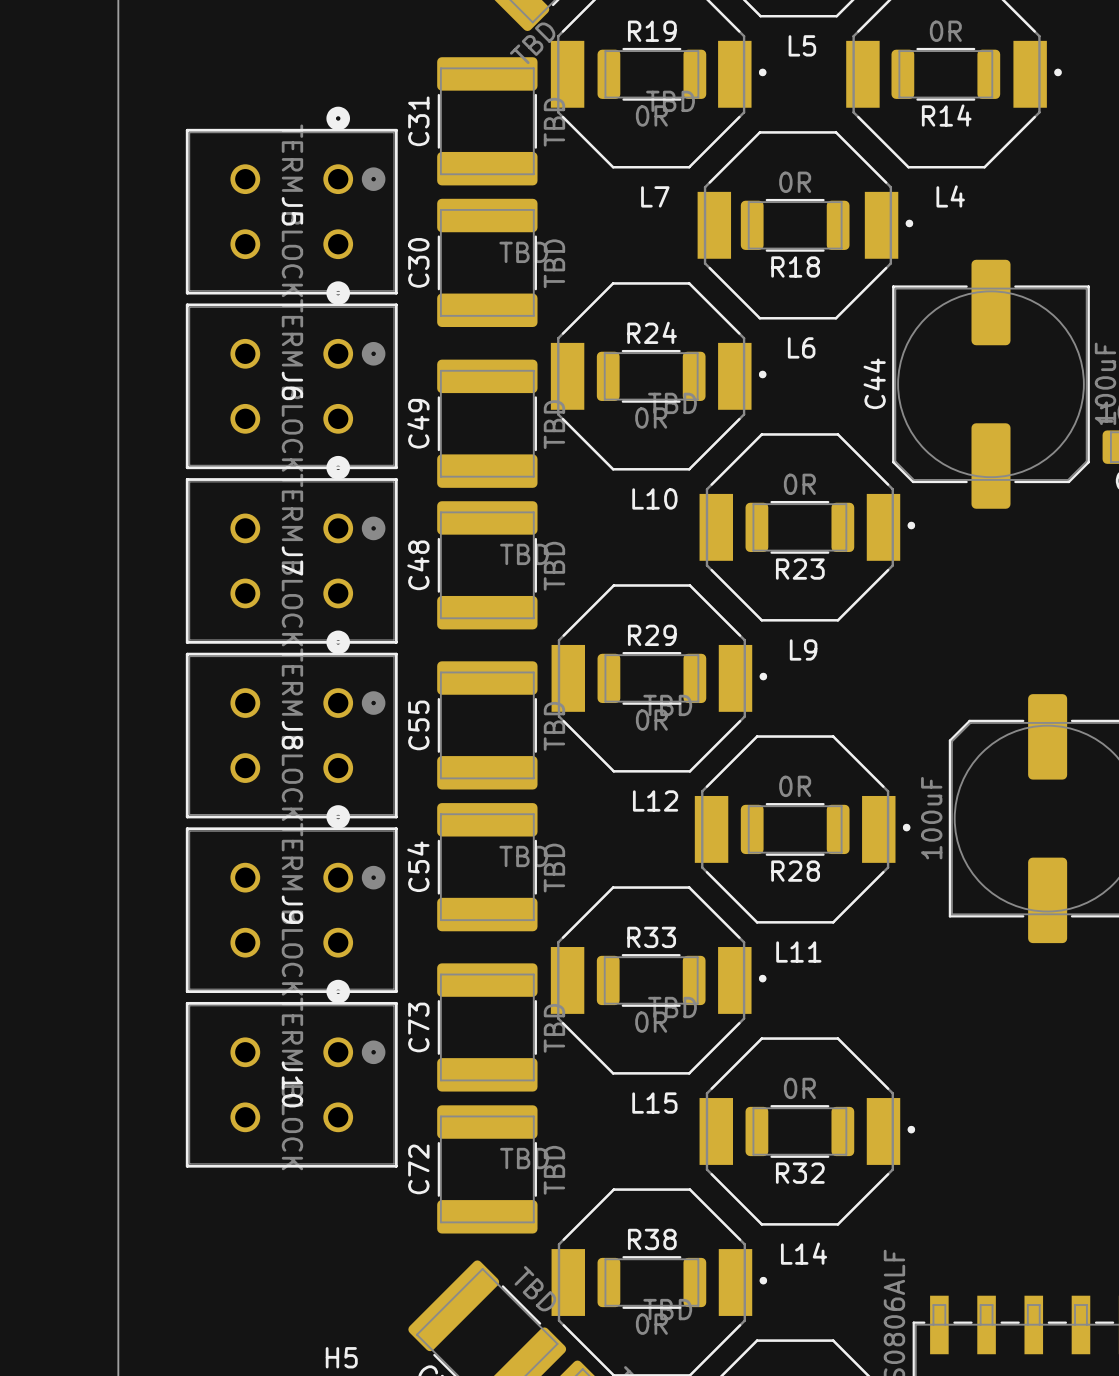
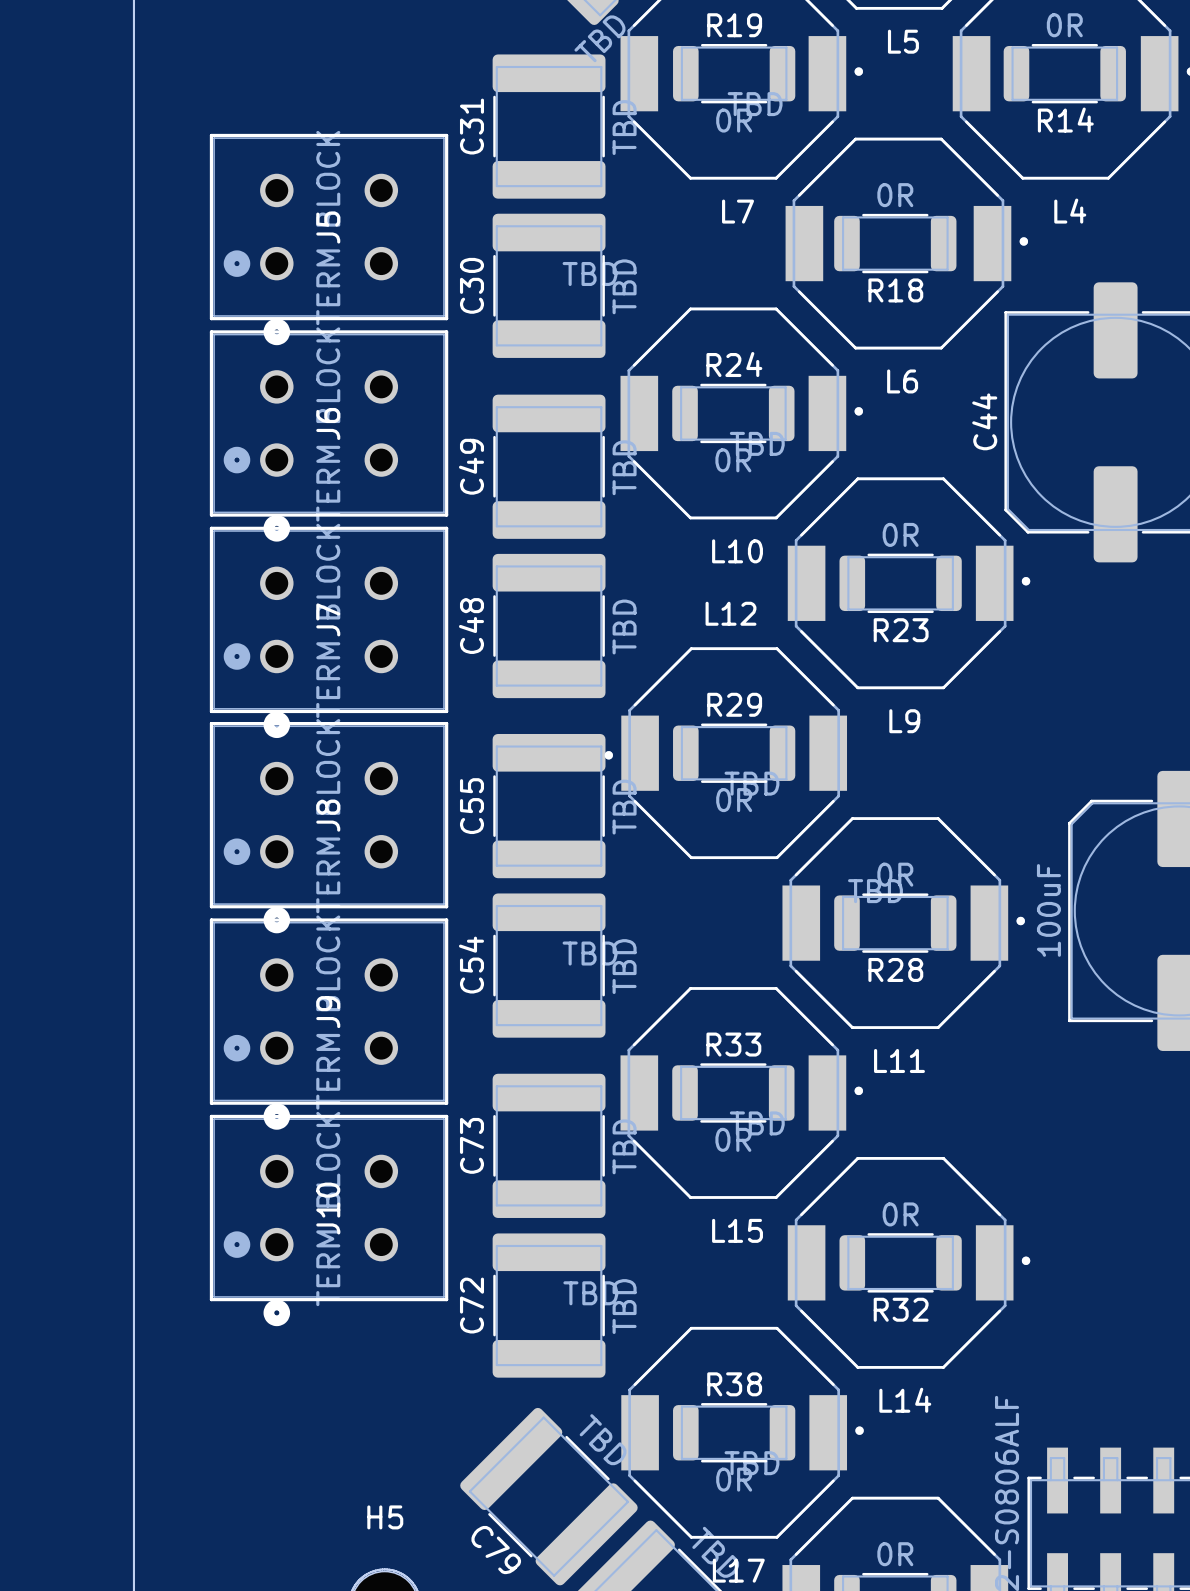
J5 rotation: 0° (291, 200) -> 180° (329, 239)
J6 rotation: 0° (291, 375) -> 180° (329, 435)
J7 rotation: 0° (291, 549) -> 180° (329, 632)
L12 rotation: 0° (659, 678) -> 180° (725, 753)
J8 rotation: 0° (291, 724) -> 180° (329, 827)
J9 rotation: 0° (291, 899) -> 180° (329, 1024)
J10 rotation: 0° (291, 1073) -> 180° (329, 1220)

